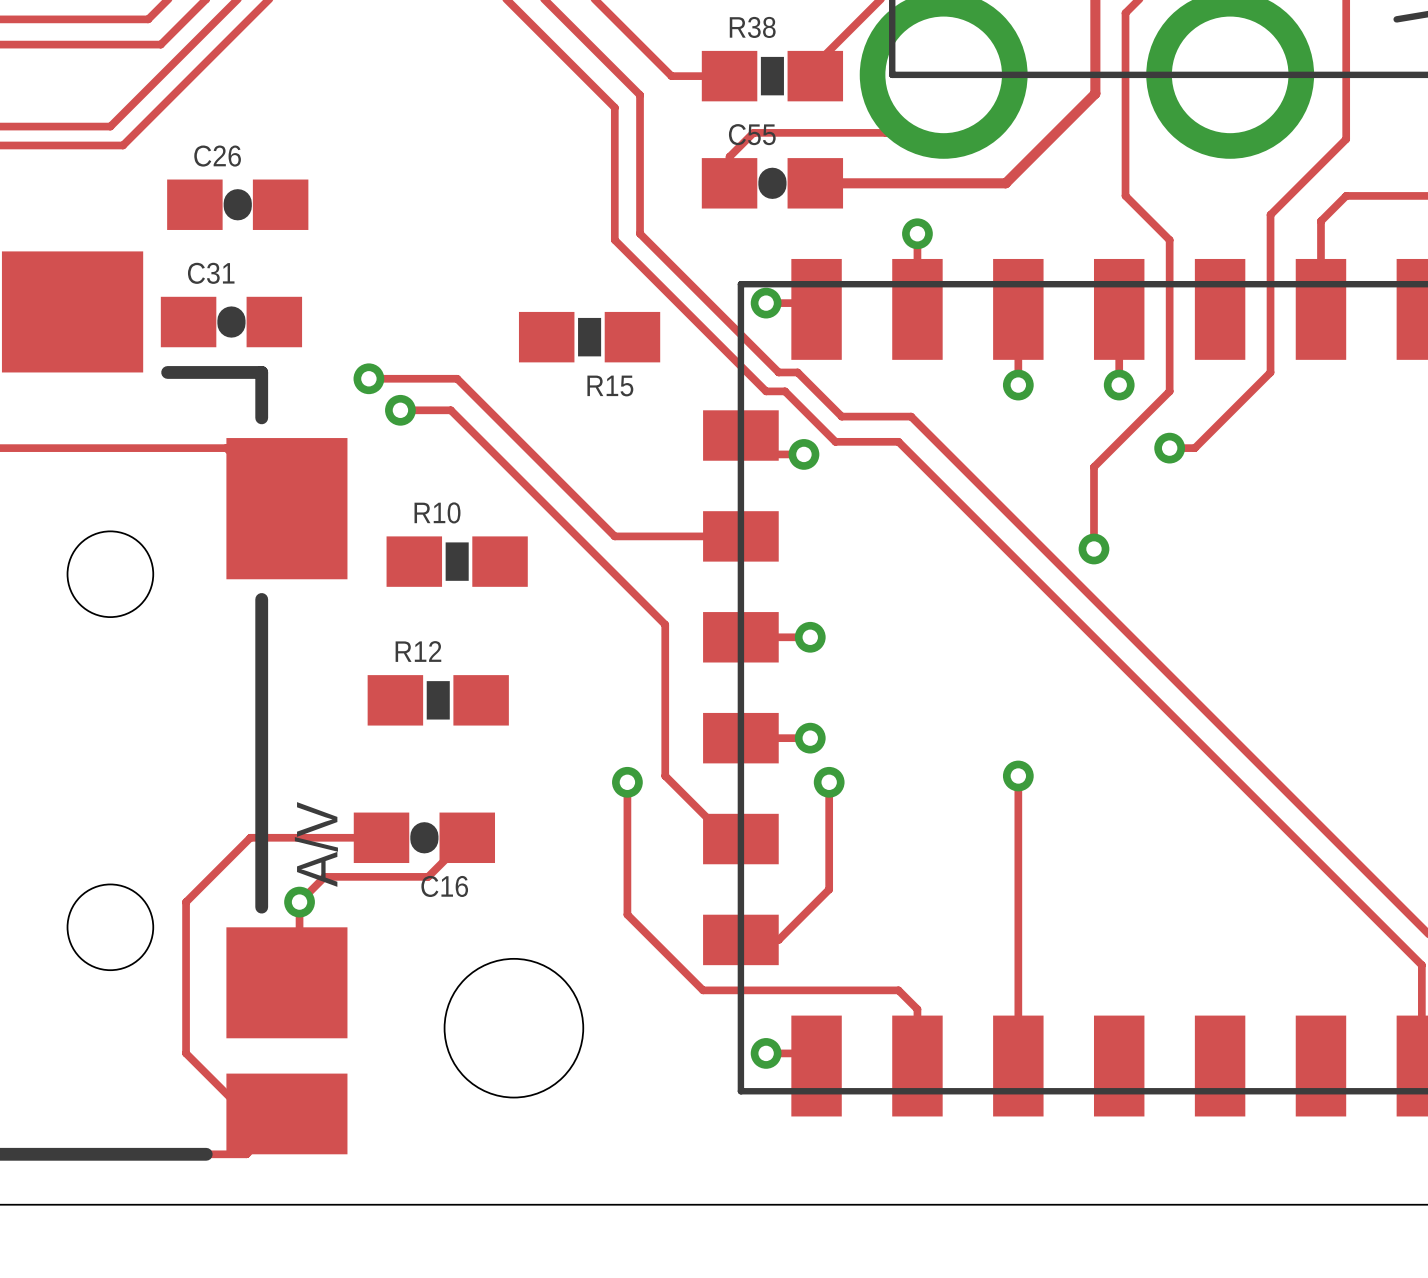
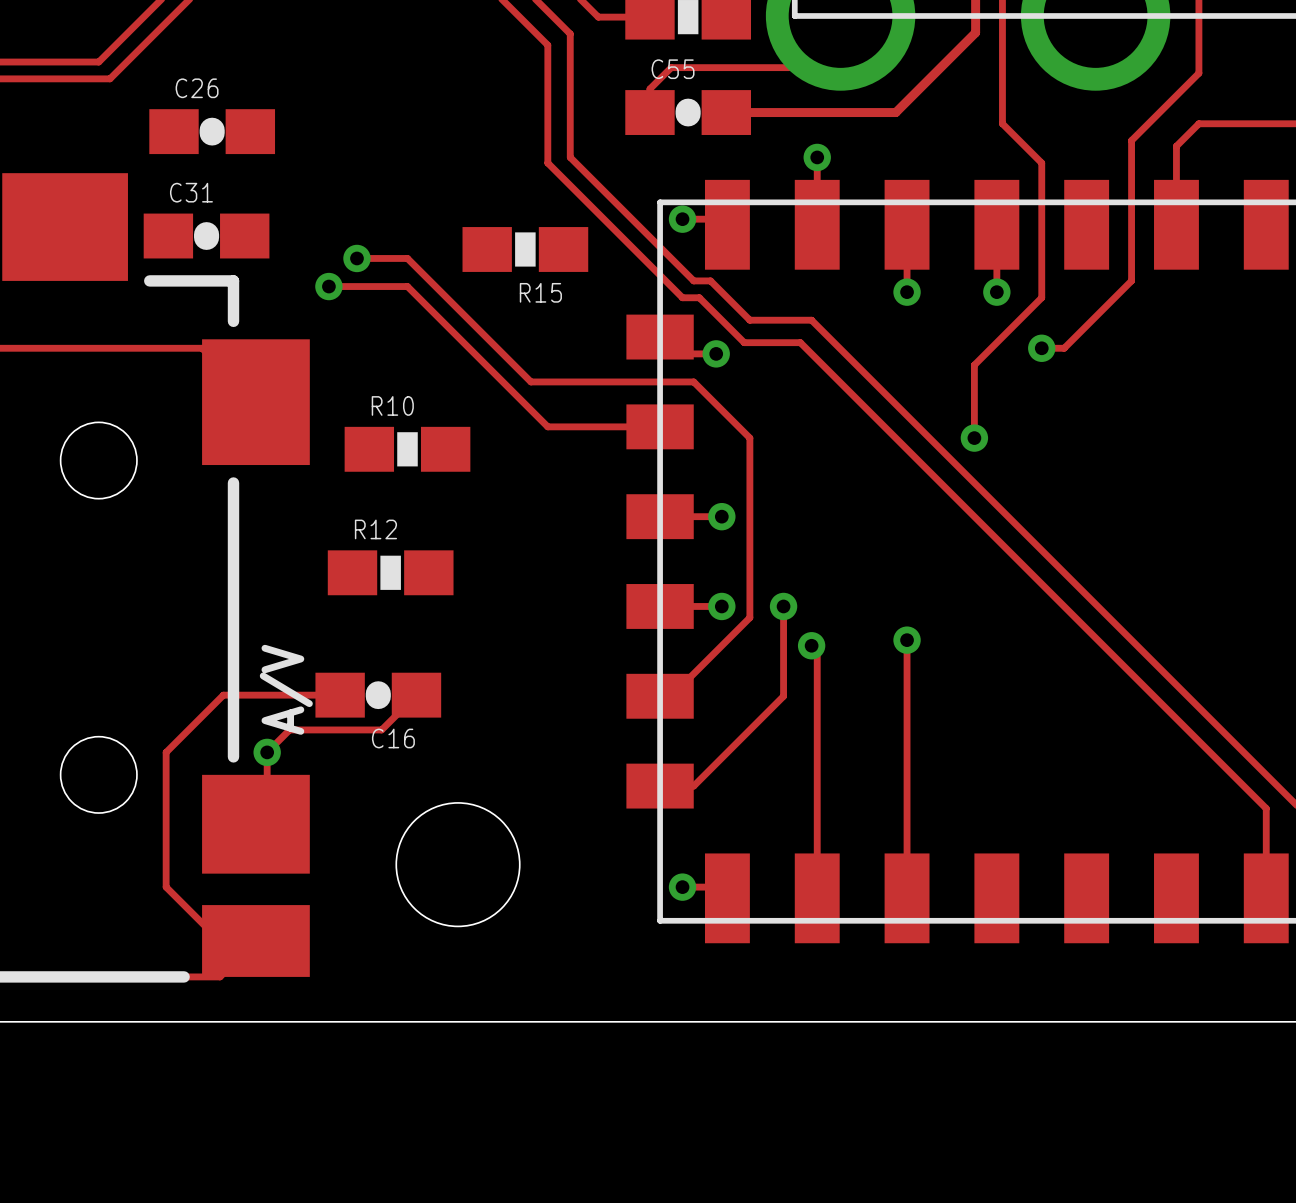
track: (400, 410) (450, 410) (665, 624) (665, 775) (728, 839) (740, 839) -> (356, 258) (407, 258) (530, 381) (693, 381) (749, 438) (749, 617) (671, 696) (660, 696)
via position: (400, 410) -> (356, 258)
via: none -> (783, 606)
track: (627, 782) (627, 914) (703, 990) (898, 990) (917, 1009) -> (811, 645) (817, 651) (817, 847)
via: (627, 782) -> none
track: (829, 782) (829, 889) -> (783, 606) (783, 696) (738, 741)
via: (829, 782) -> none
via: none -> (811, 645)

